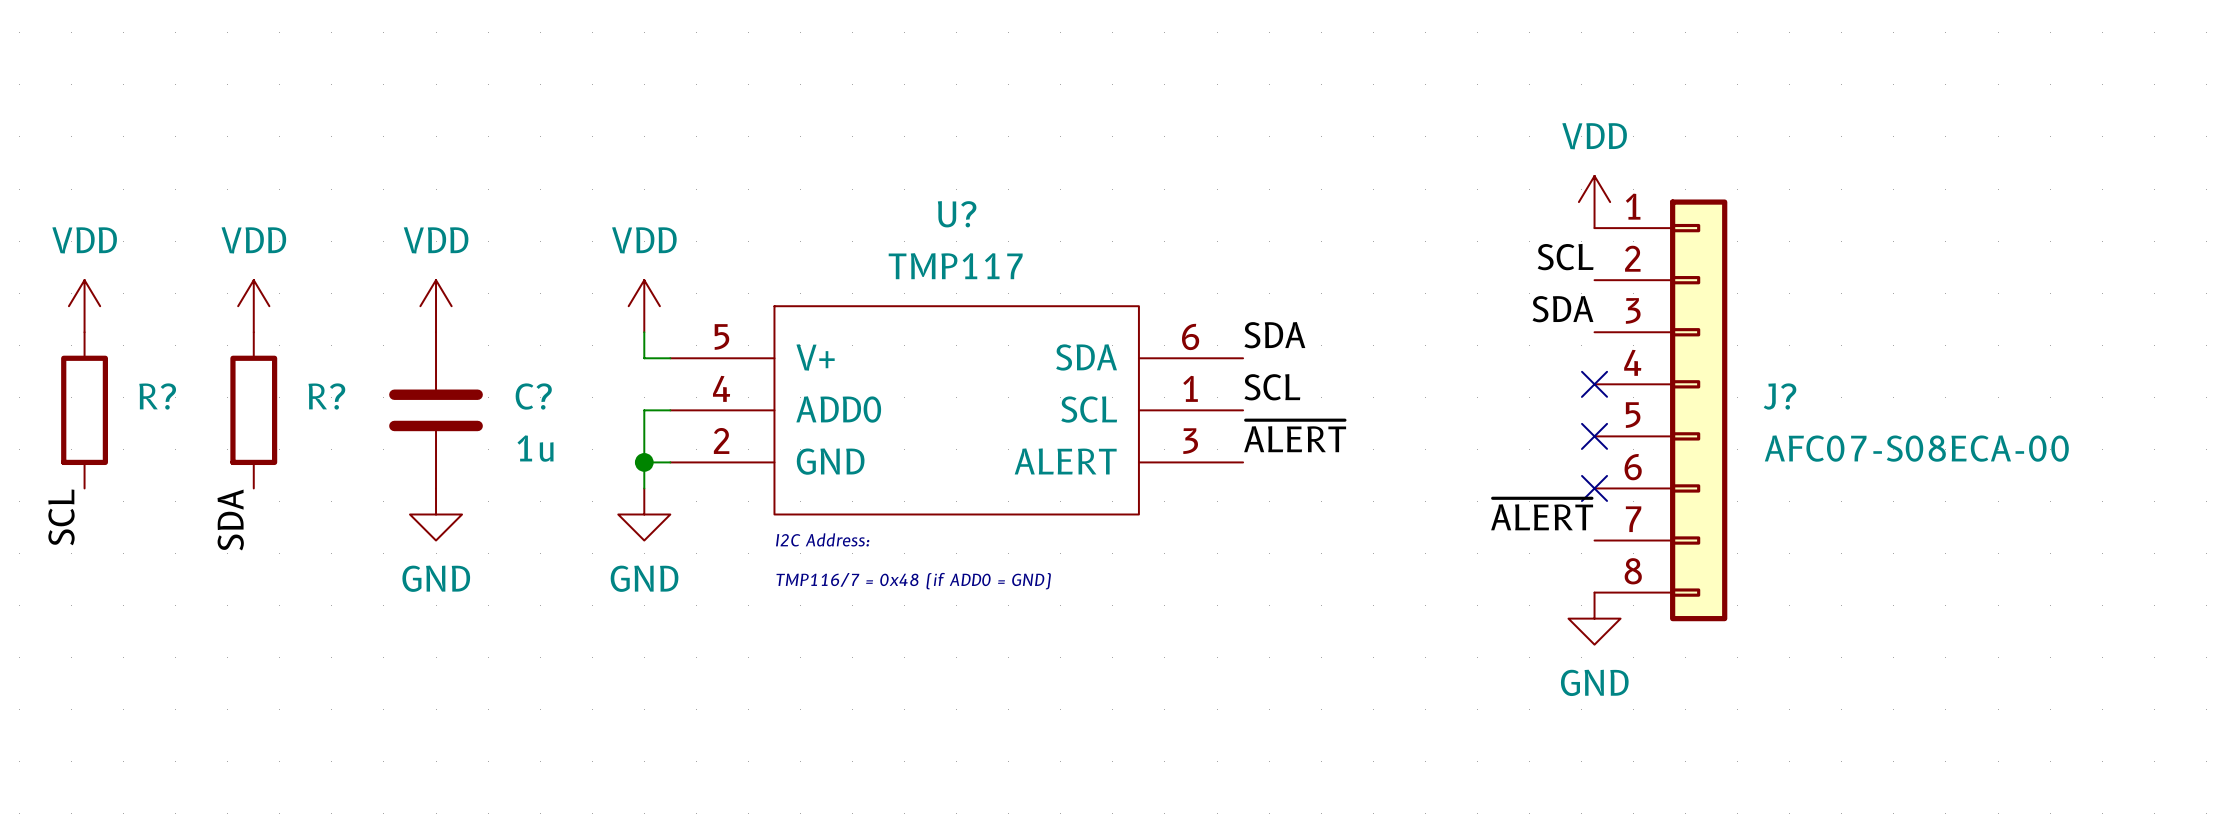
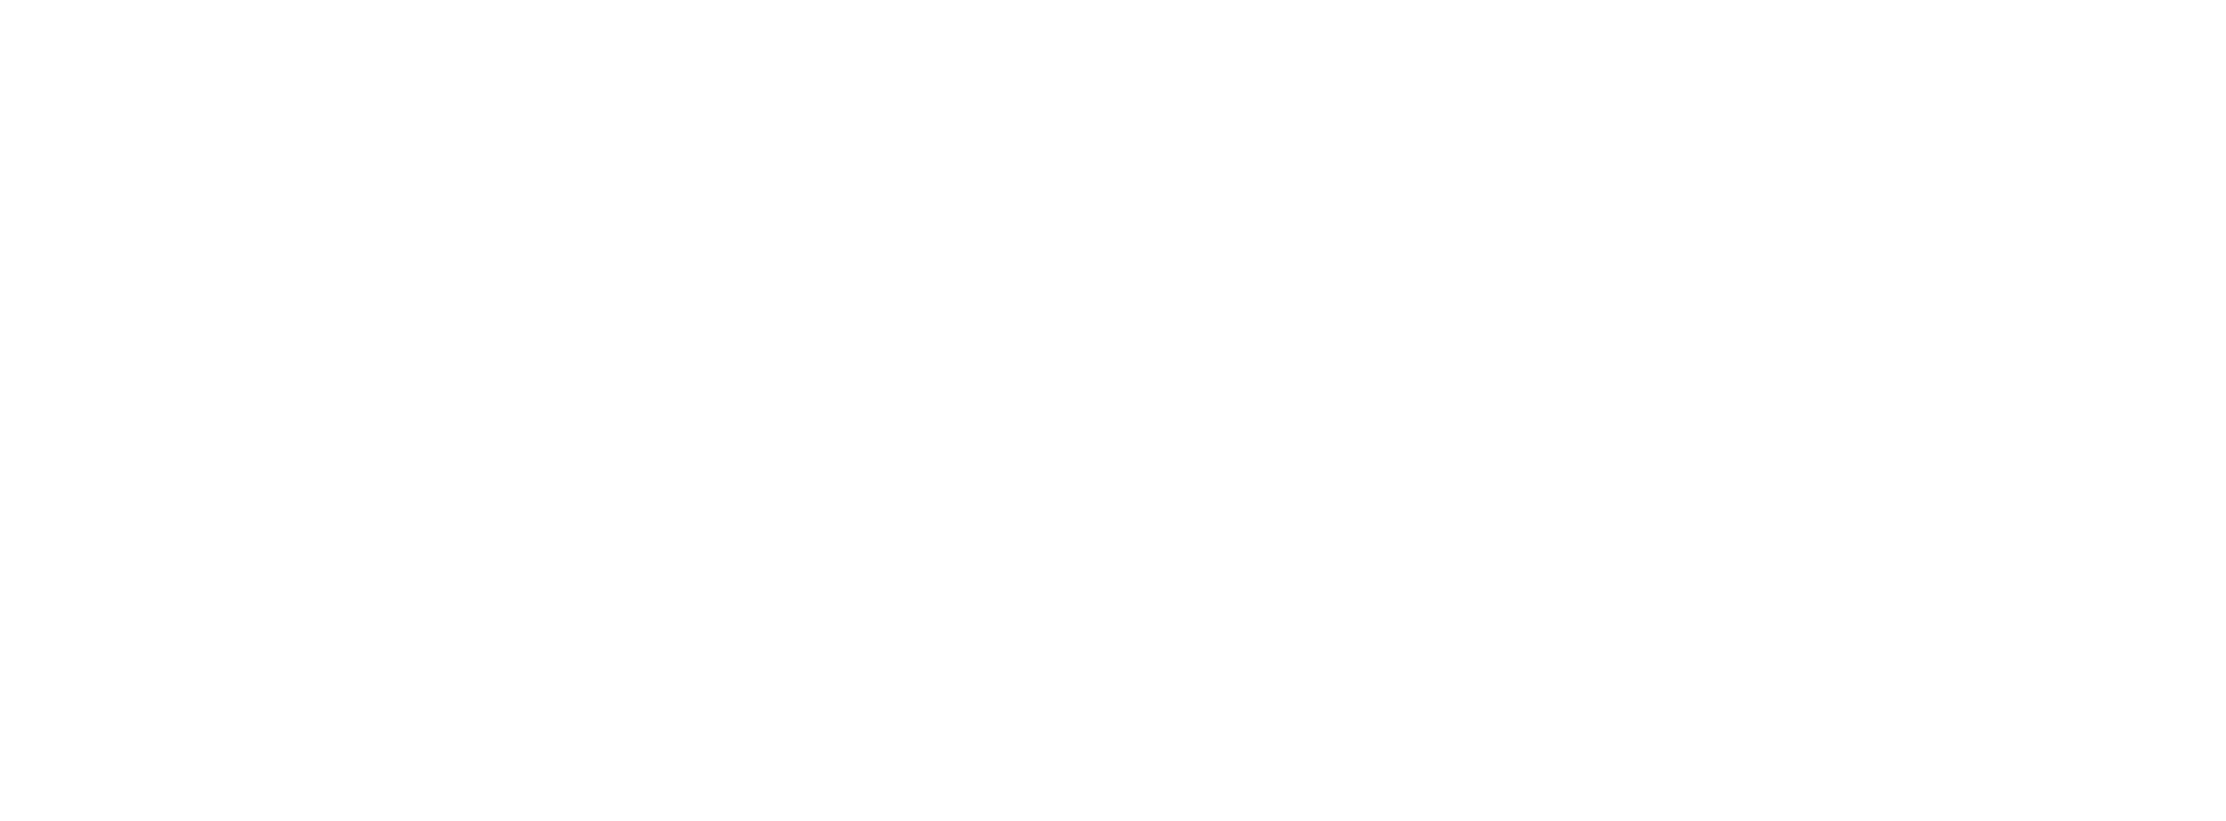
power symbol: VDD (1594, 202) -> none
label: SCL (1565, 257) -> none
power symbol: VDD (84, 306) -> none
power symbol: VDD (253, 306) -> none
power symbol: VDD (436, 306) -> none
power symbol: VDD (644, 306) -> none
label: SDA (1562, 309) -> none
wire: (644, 332) (644, 358) (670, 358) -> none
label: SDA (1274, 335) -> none
no-connect mark: (1594, 384) -> none
label: SCL (1272, 387) -> none
R?: (84, 410) -> none
R?: (253, 410) -> none
C?: 1u (436, 410) -> none
wire: (670, 410) (644, 410) (644, 488) -> none
U?: TMP117 (956, 410) -> none
J?: AFC07-S08ECA-00 (1660, 410) -> none
label: ~{ALERT} (1295, 436) -> none
no-connect mark: (1594, 436) -> none
wire: (644, 462) (670, 462) -> none
junction: (644, 462) -> none
no-connect mark: (1594, 488) -> none
power symbol: GND (436, 514) -> none
power symbol: GND (644, 514) -> none
label: ~{ALERT} (1542, 514) -> none
label: SCL (61, 517) -> none
label: SDA (230, 519) -> none
text: I2C Address: (822, 539) -> none
text: TMP116/7 = 0x48 (if ADD0 = GND) (913, 581) -> none
power symbol: GND (1594, 618) -> none

